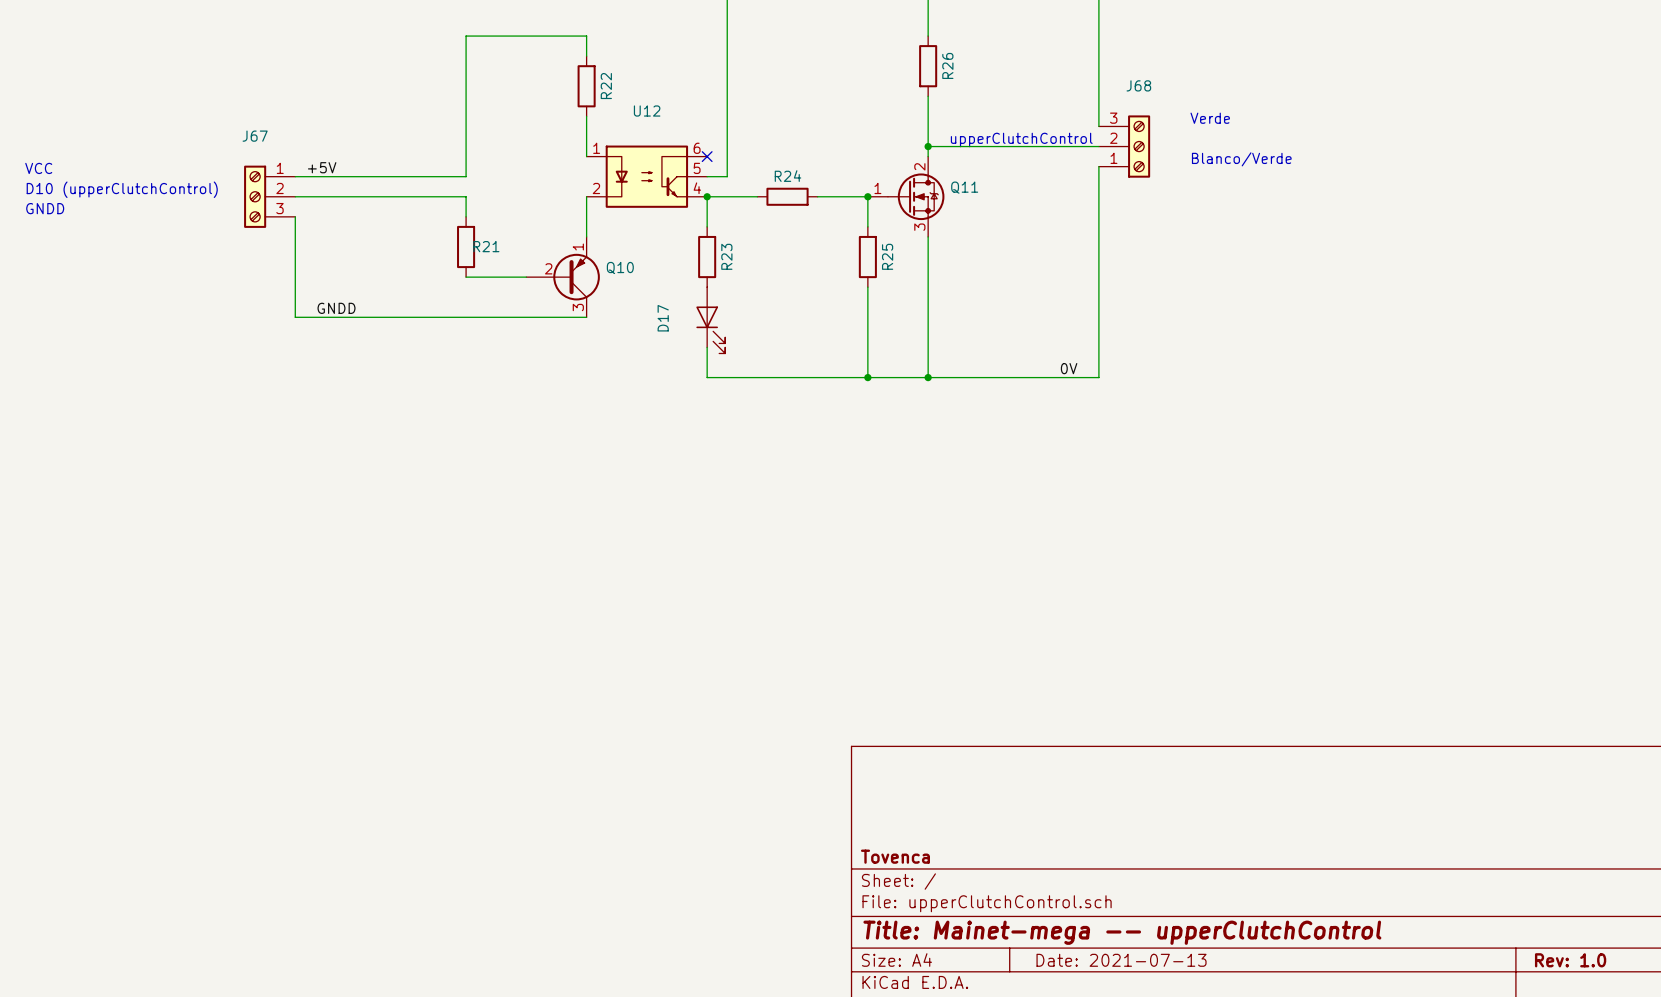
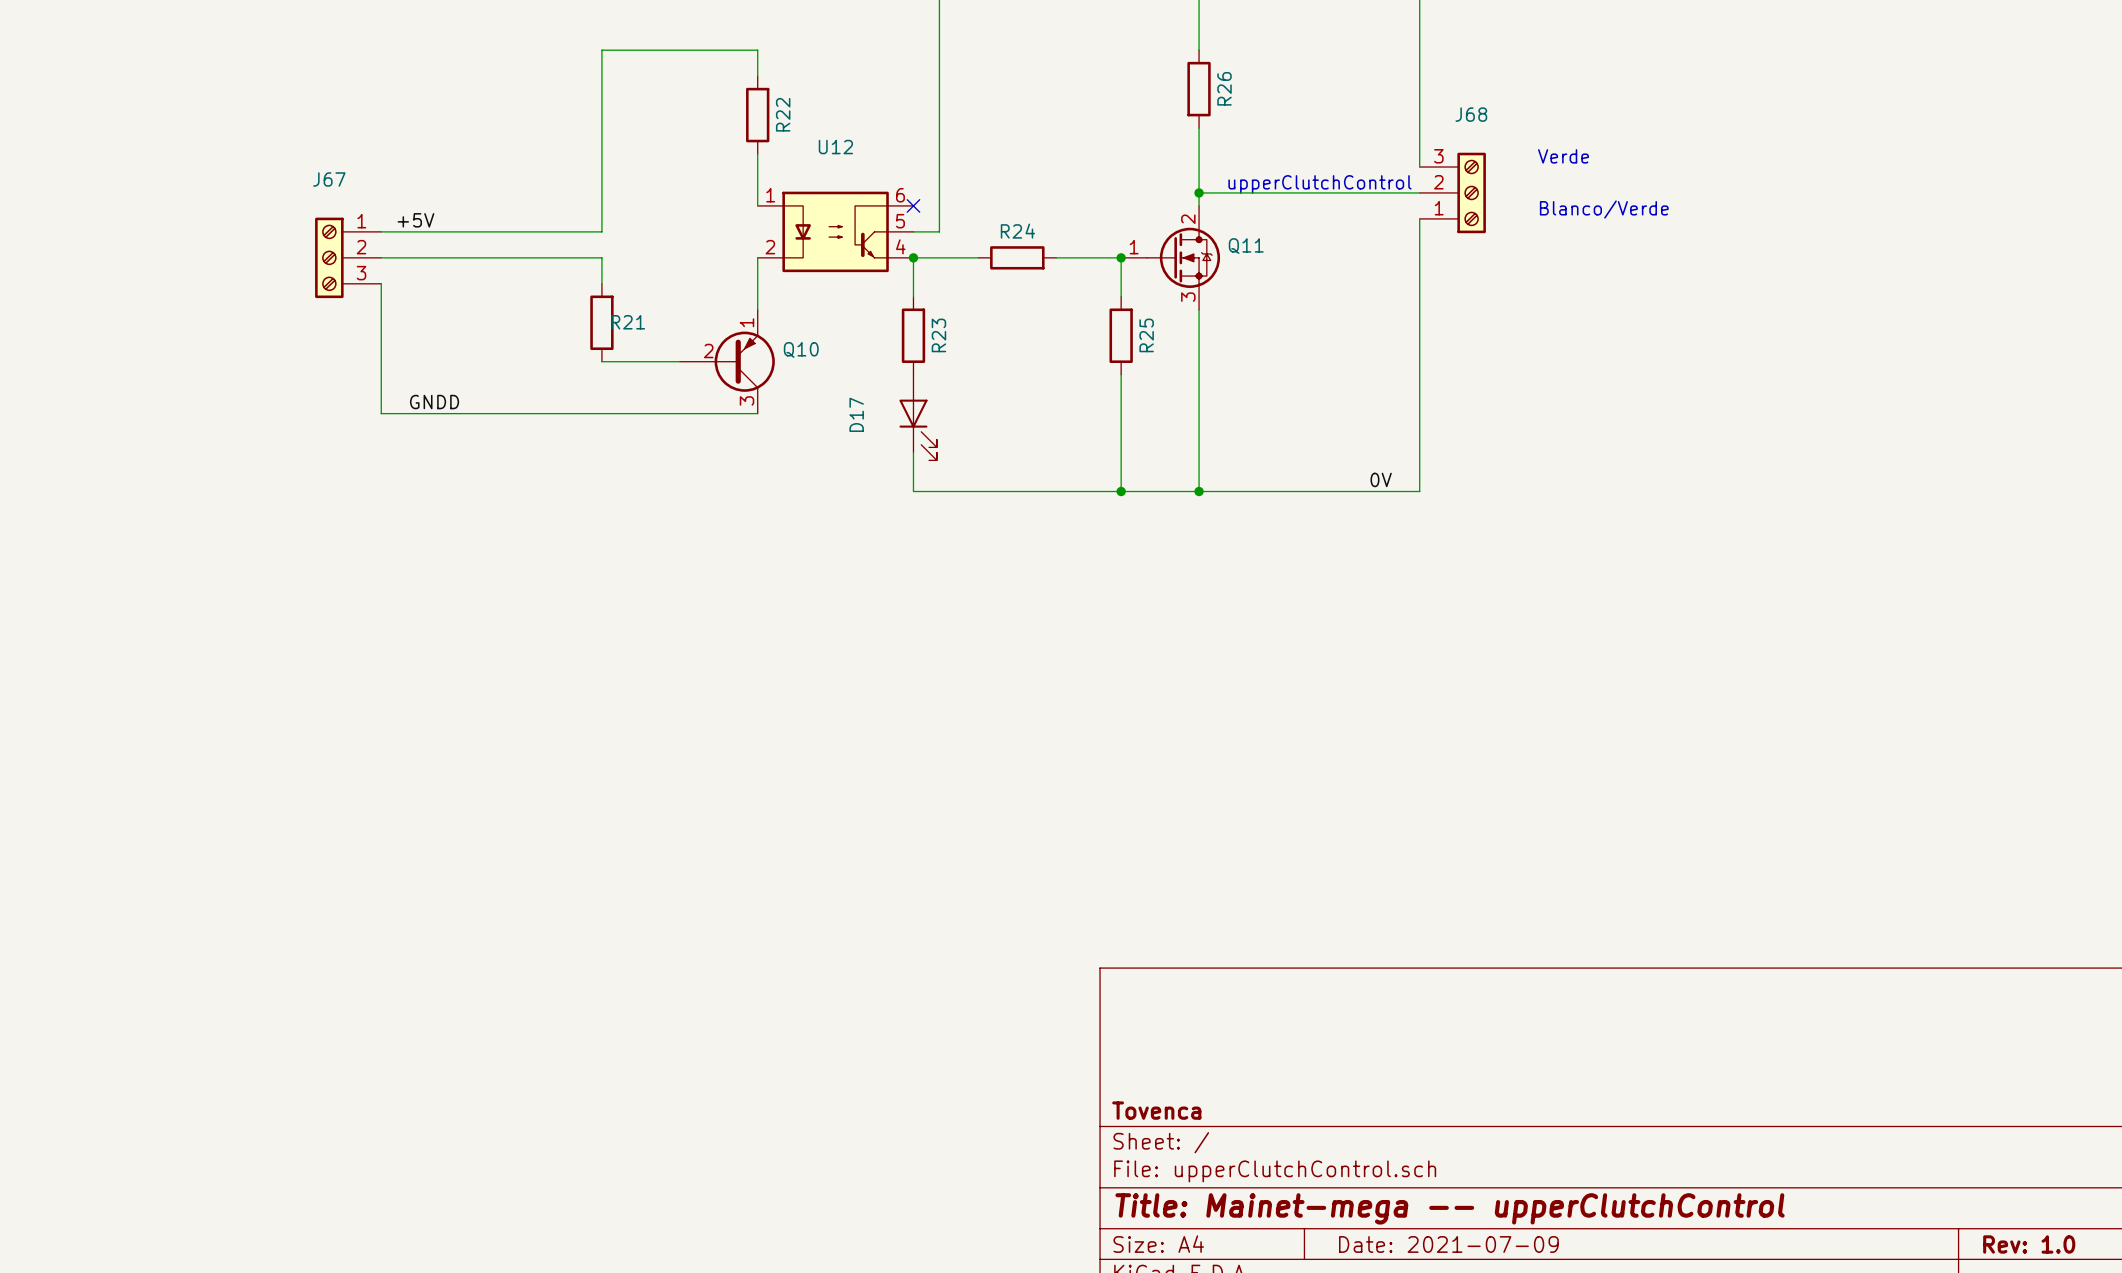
text: VCC (38, 168) -> none
text: D10 (upperClutchControl) (122, 189) -> none
text: GNDD (45, 208) -> none
title block: Date: 2021-07-13 (1121, 960) -> Date: 2021-07-09 (1448, 1244)

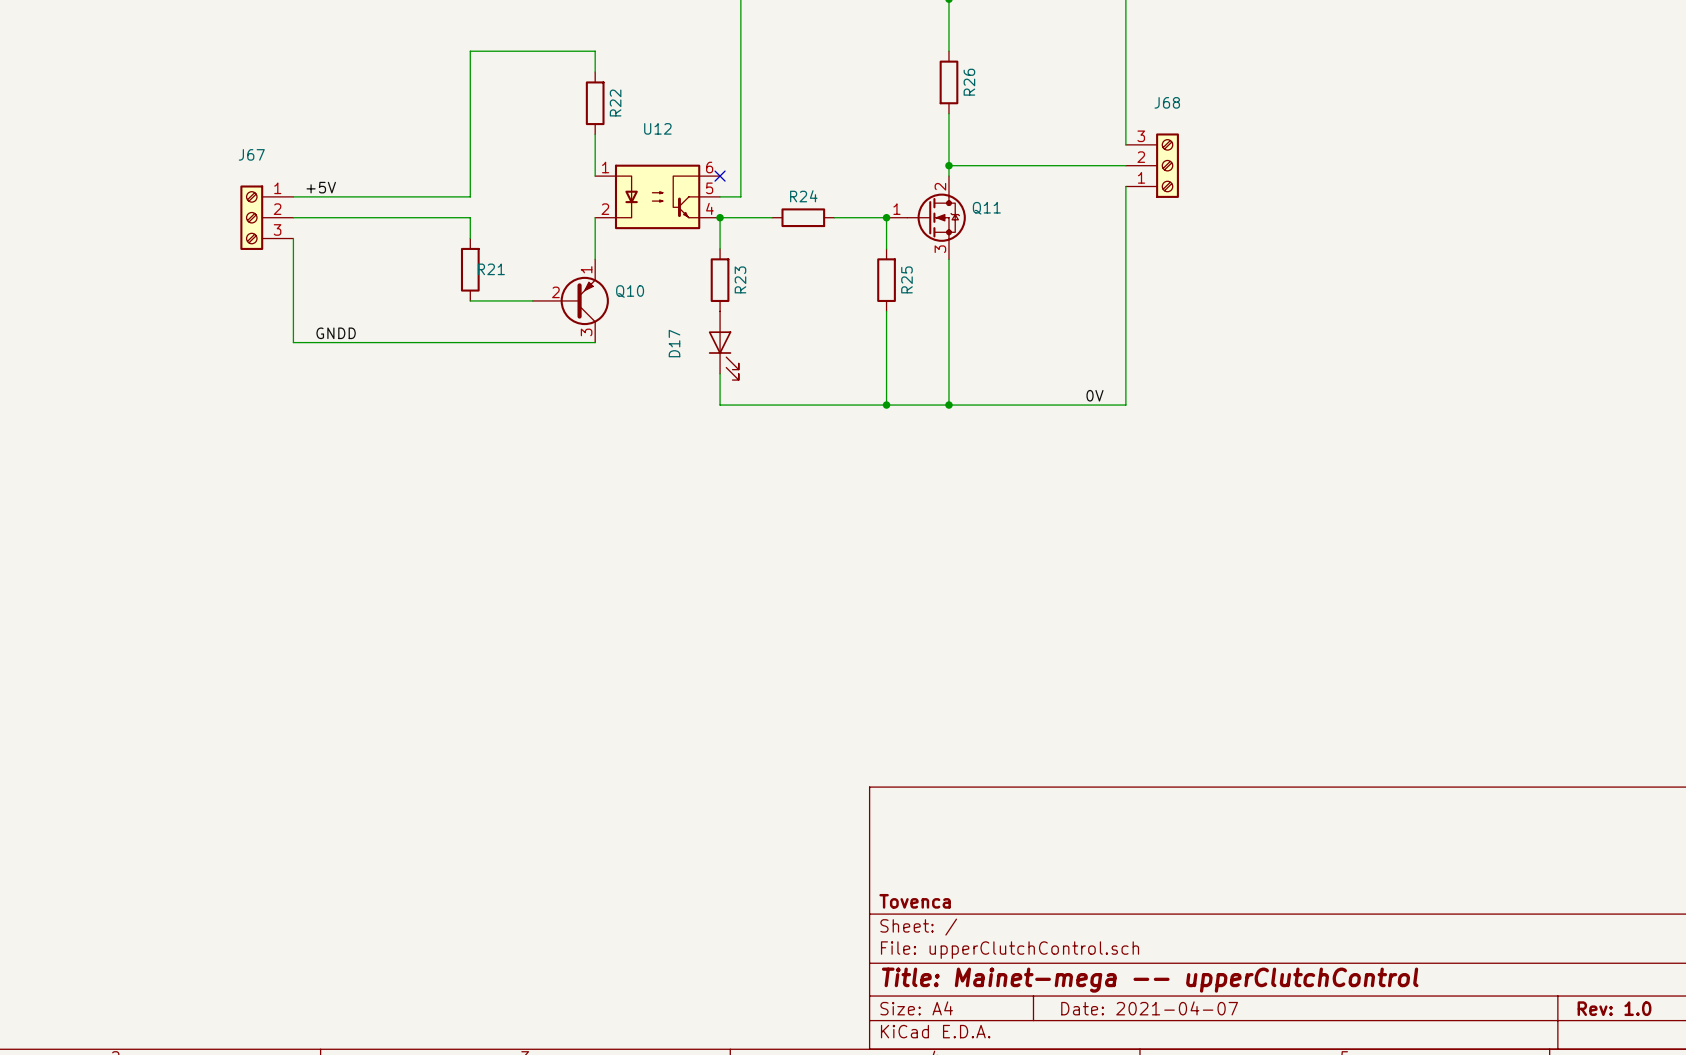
text: Verde (1563, 156) -> none
text: upperClutchControl (1319, 184) -> none
text: Blanco/Verde (1604, 209) -> none
title block: Date: 2021-07-09 (1448, 1244) -> Date: 2021-04-07 (1149, 1008)

